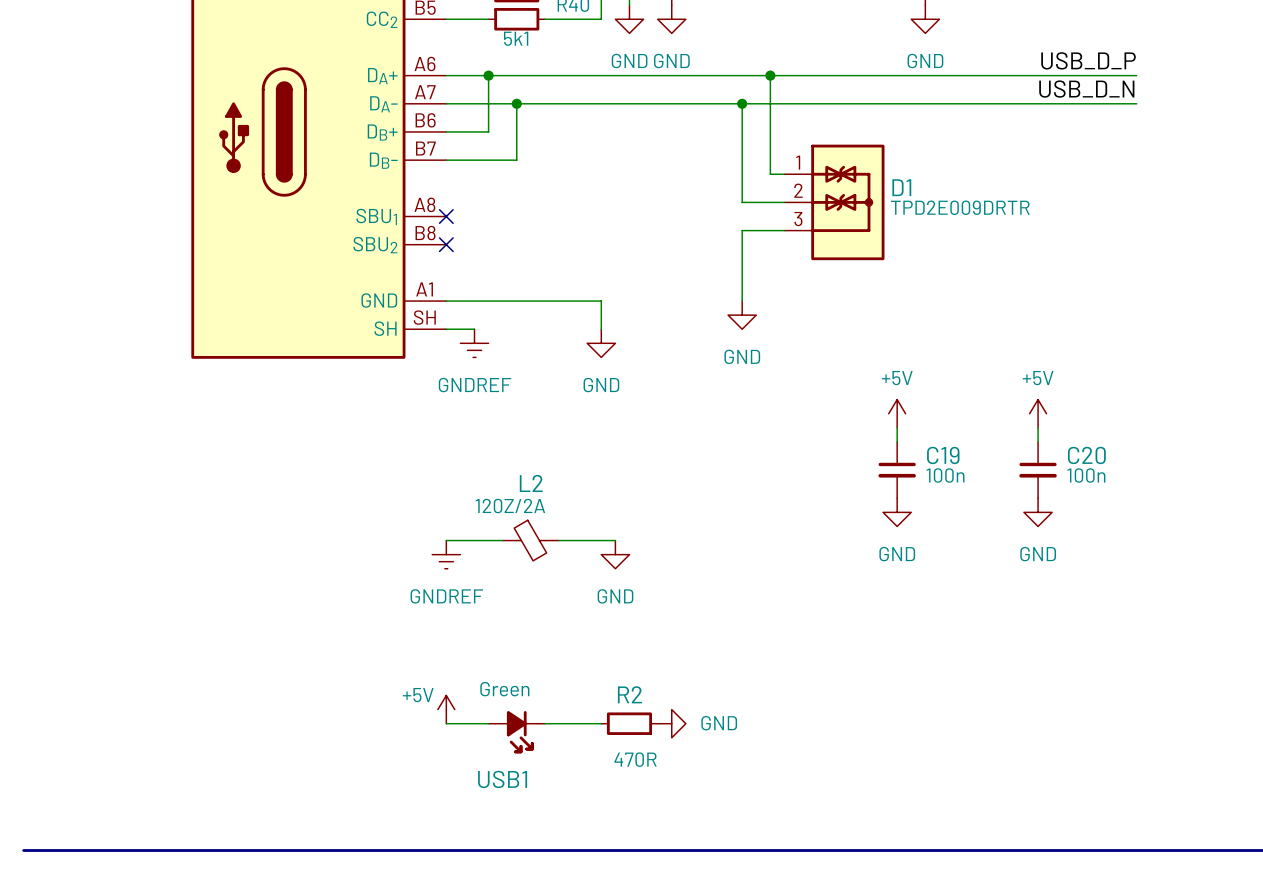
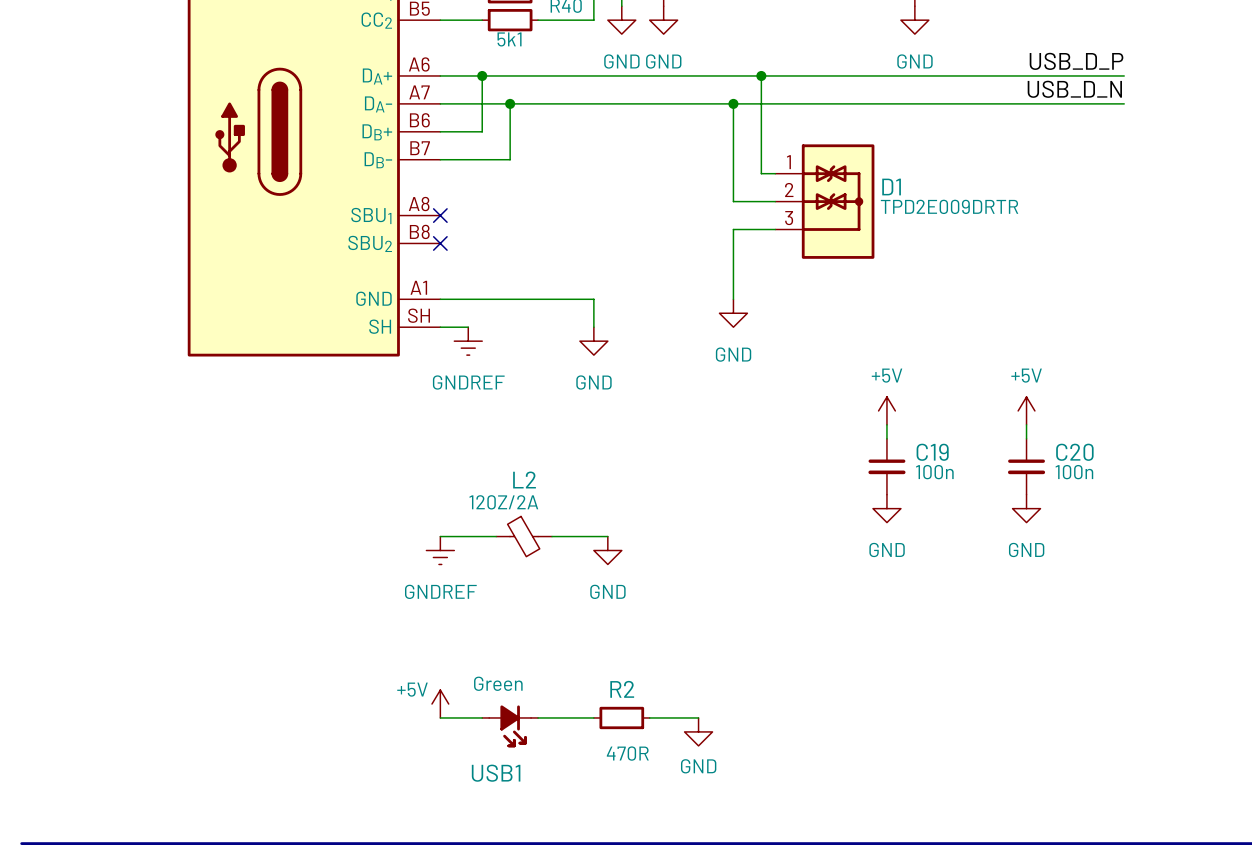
wire: none -> (649, 717) (698, 717)
power symbol rotation: 0° (671, 723) -> 90° clockwise (698, 731)
power symbol position: GND (671, 723) -> GND (698, 731)

